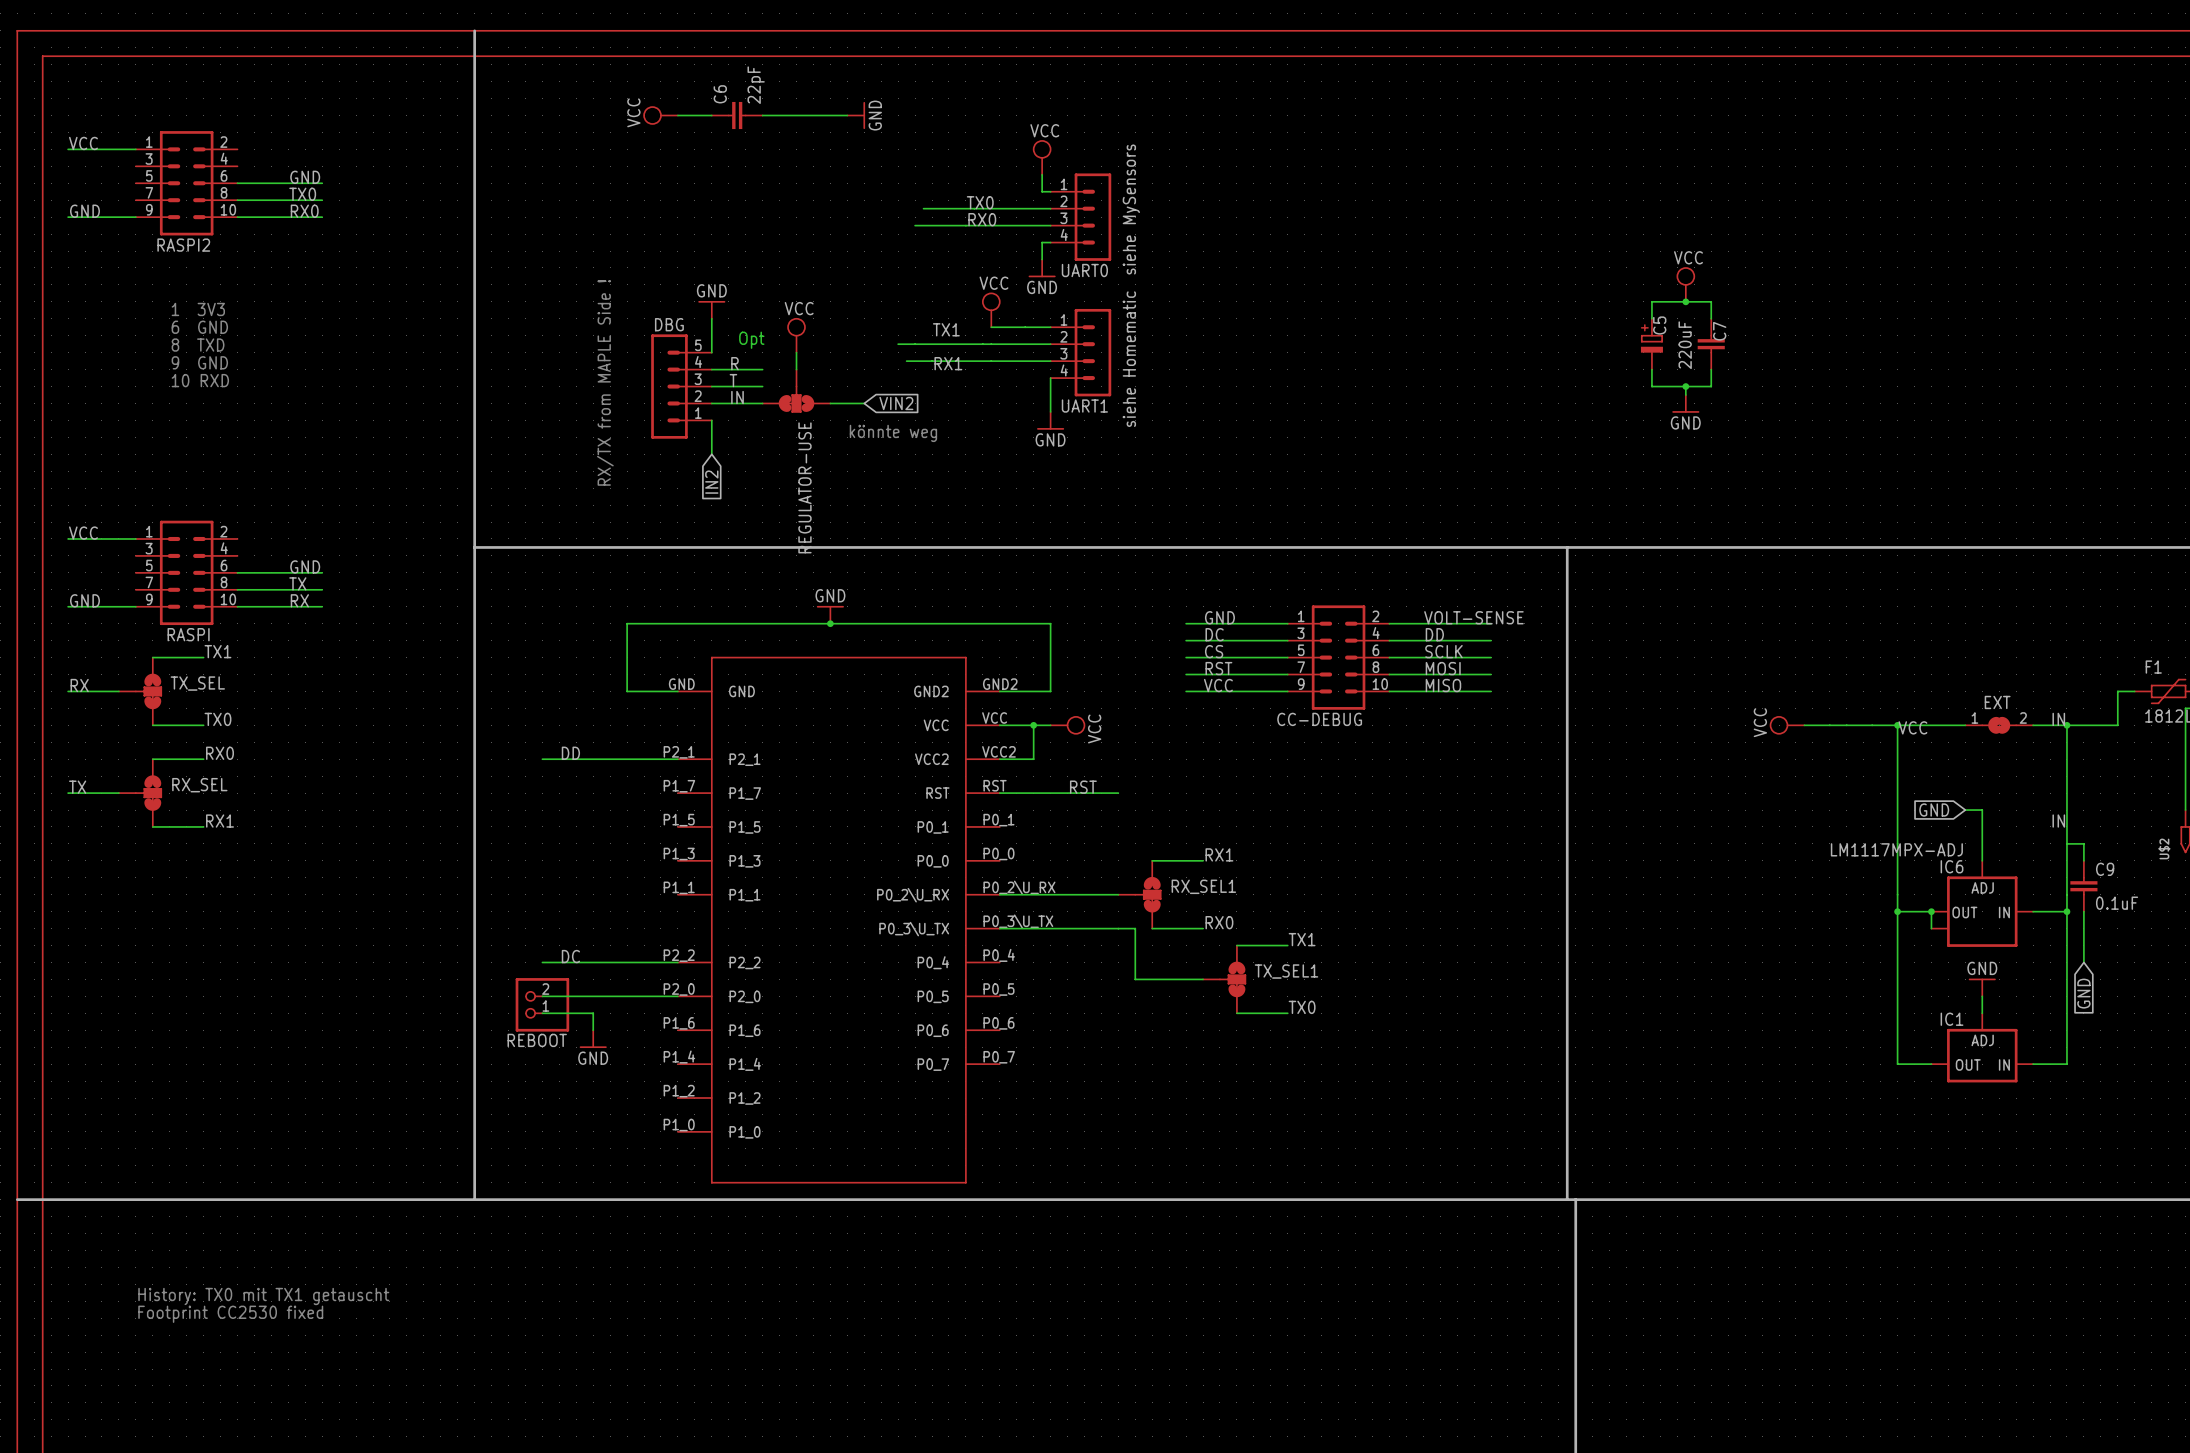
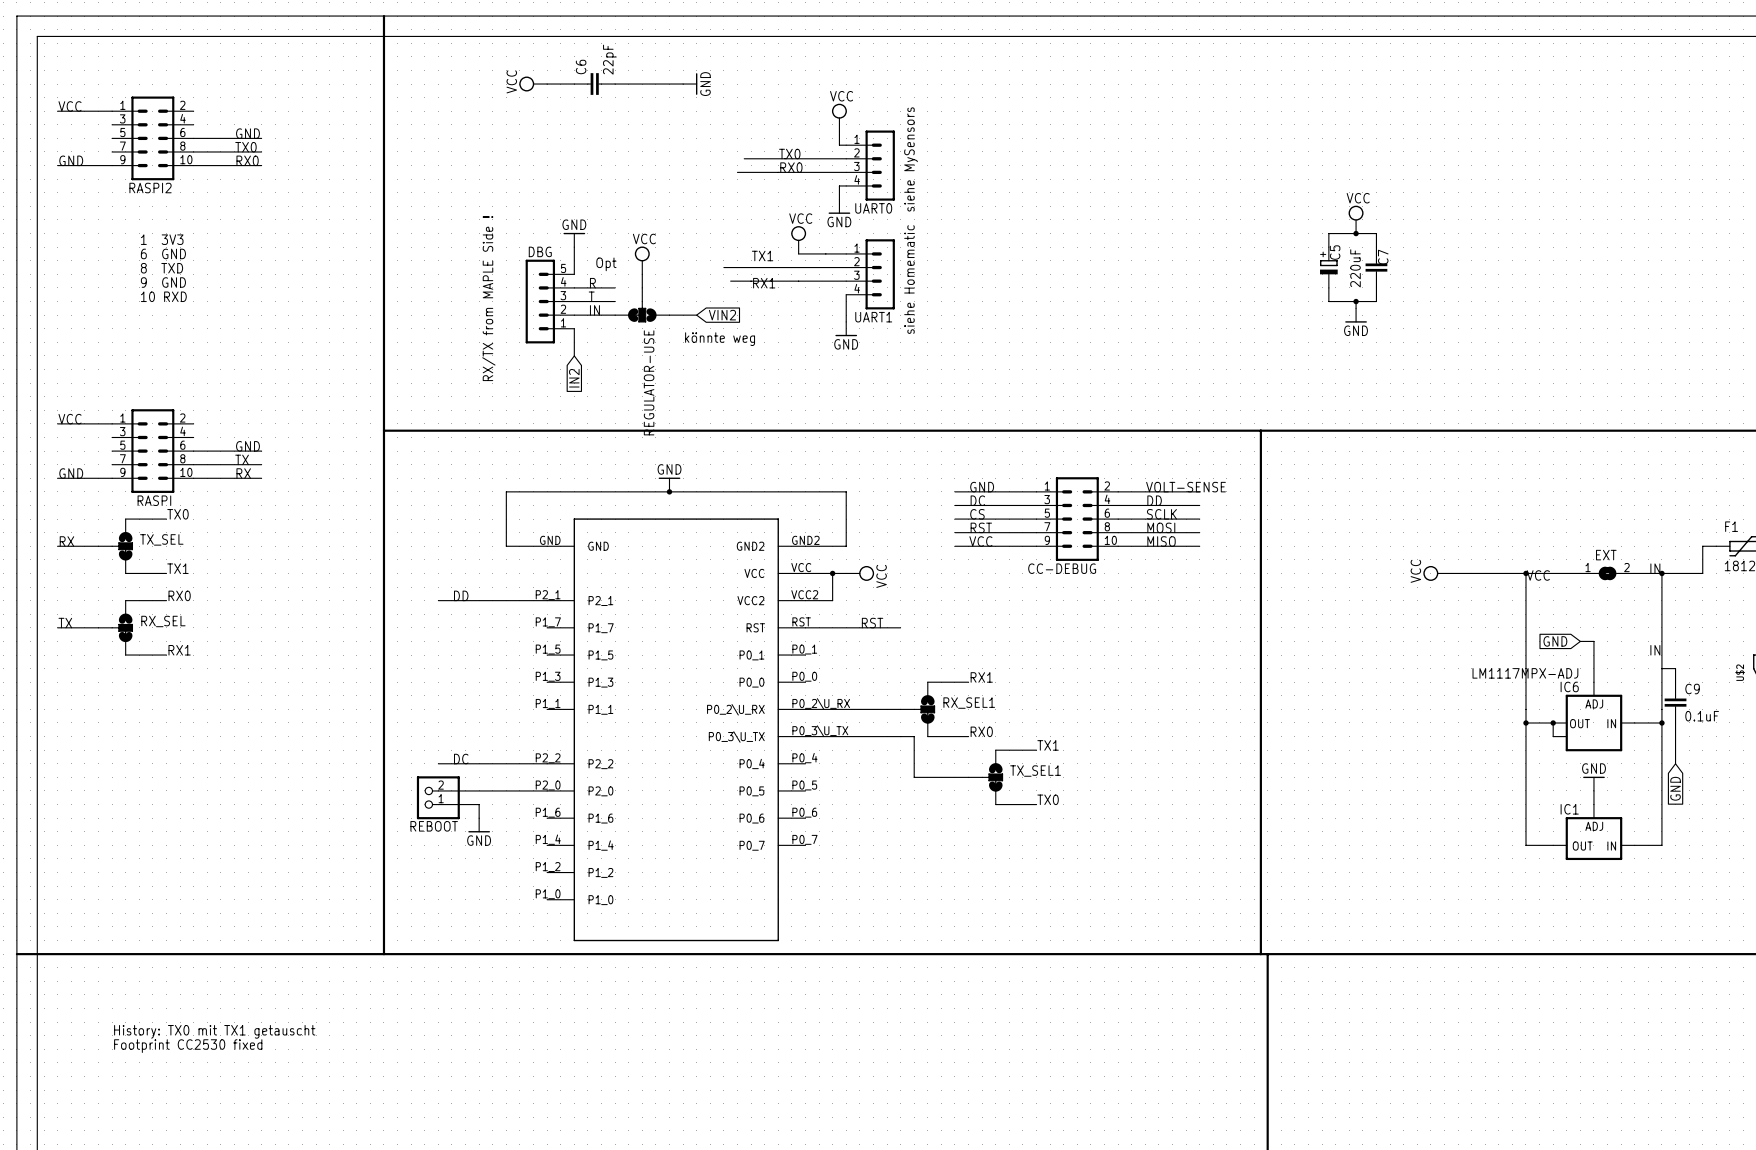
label: TX1 (217, 651) -> TX0 (177, 514)
label: TX0 (217, 719) -> TX1 (177, 568)

